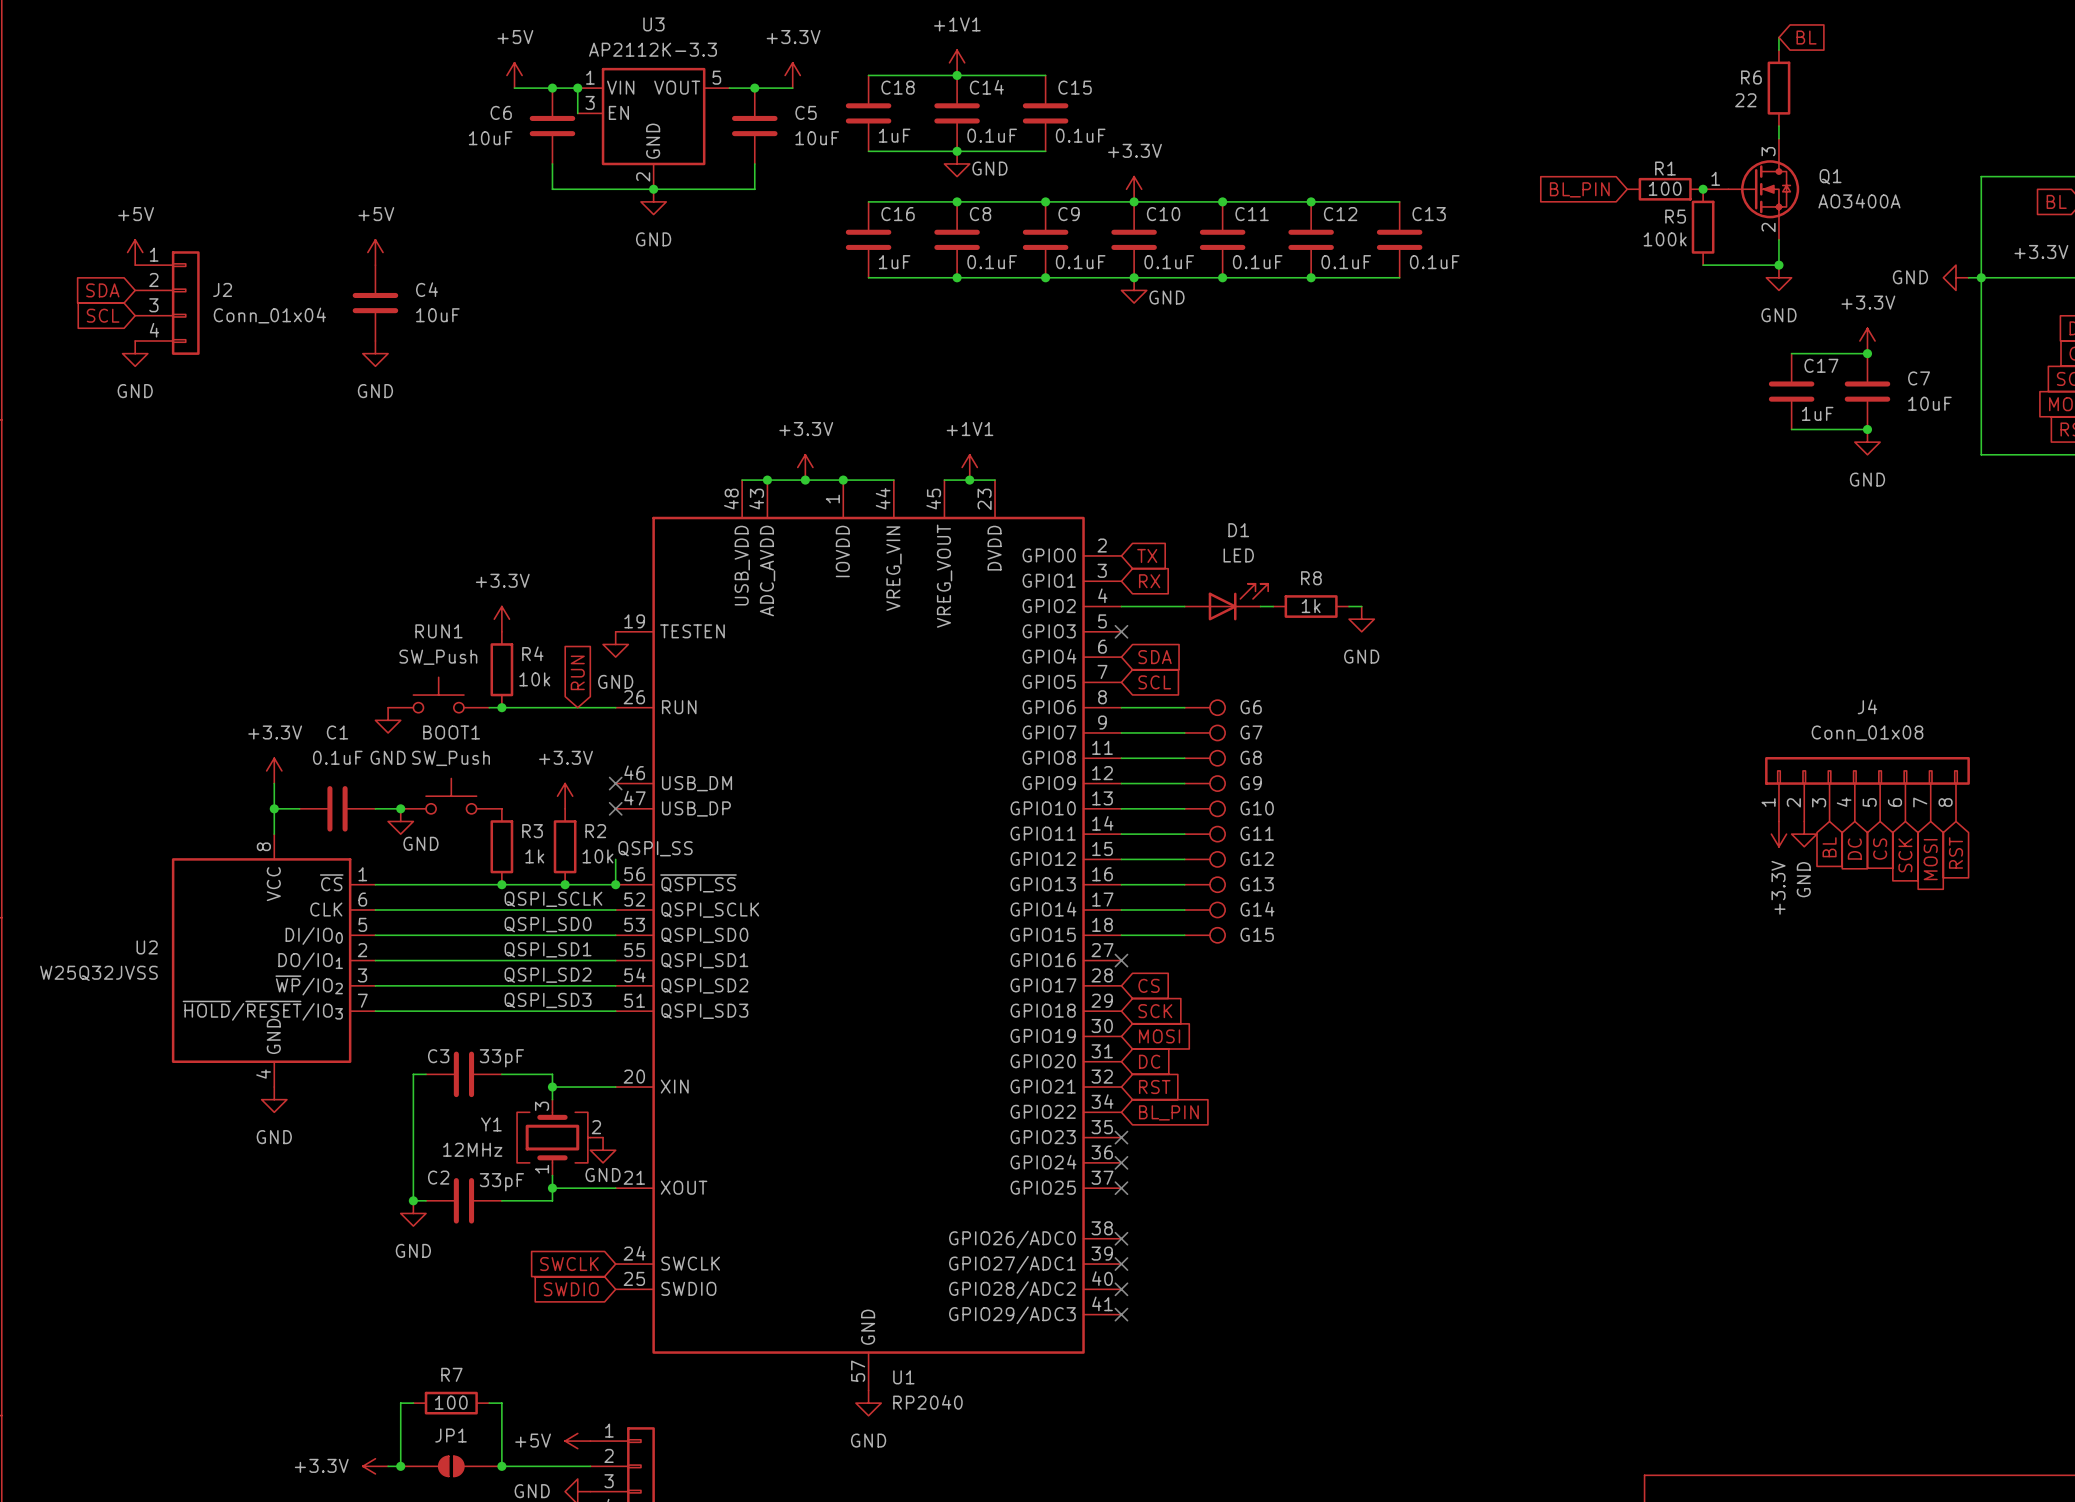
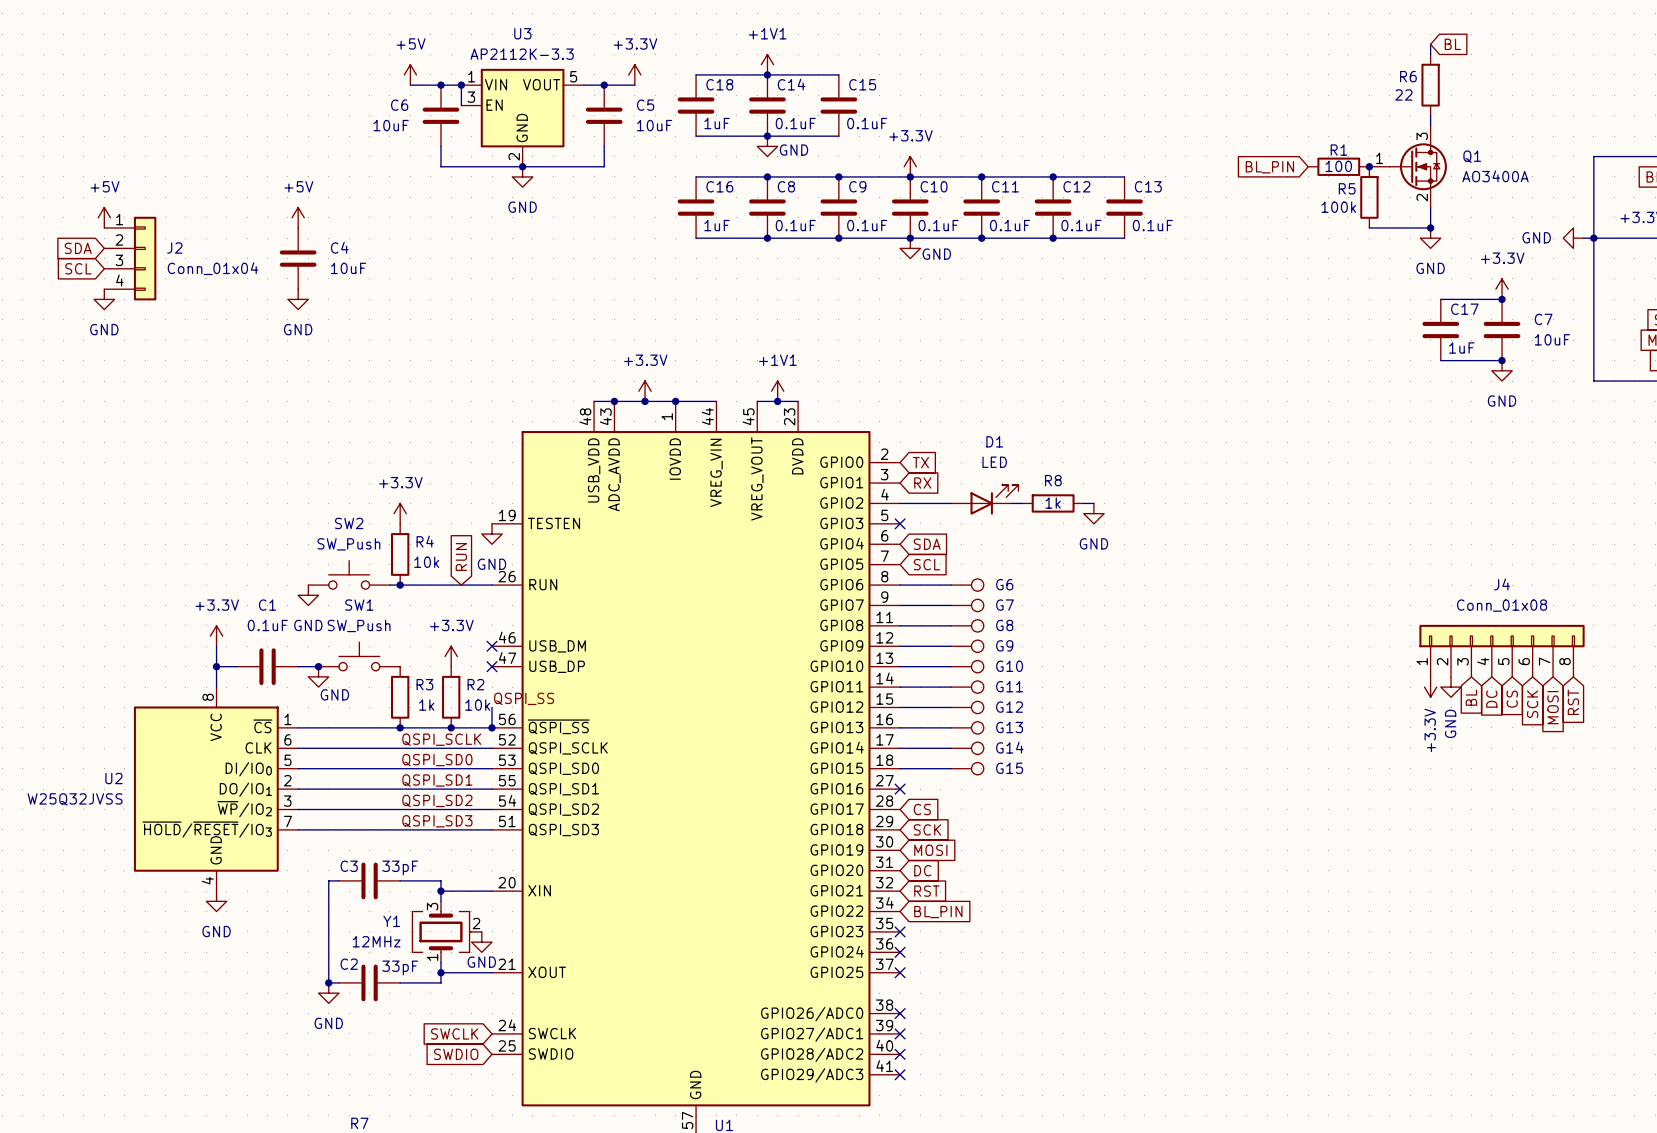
RUN1 name: RUN1 (438, 631) -> SW2 (349, 523)
BOOT1 name: BOOT1 (451, 732) -> SW1 (359, 605)

